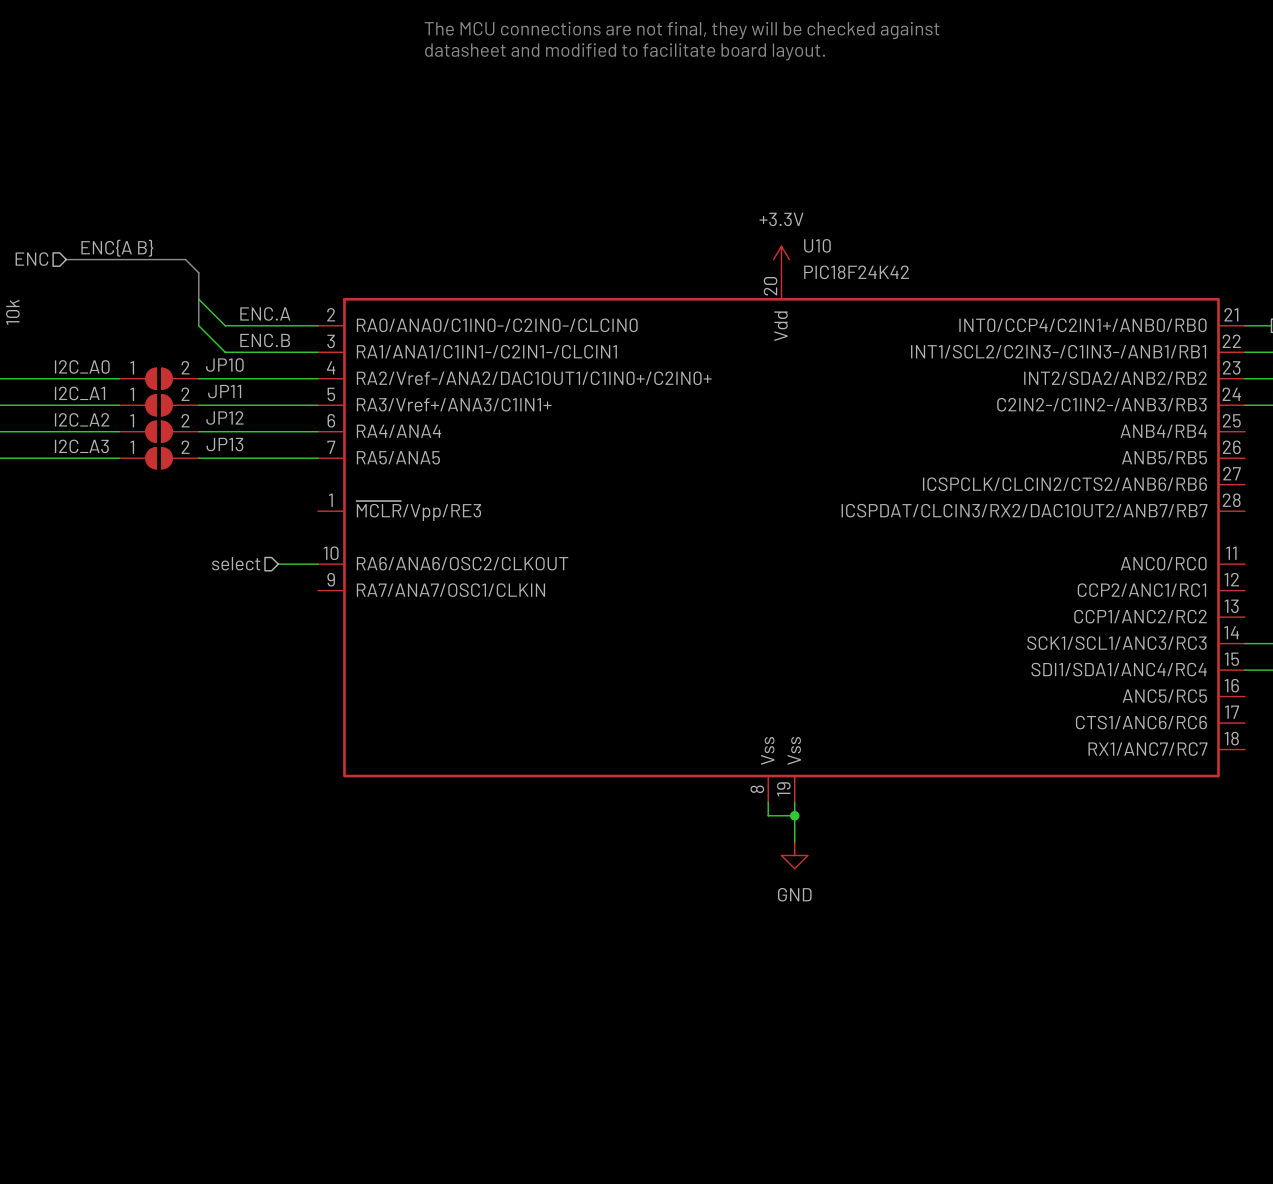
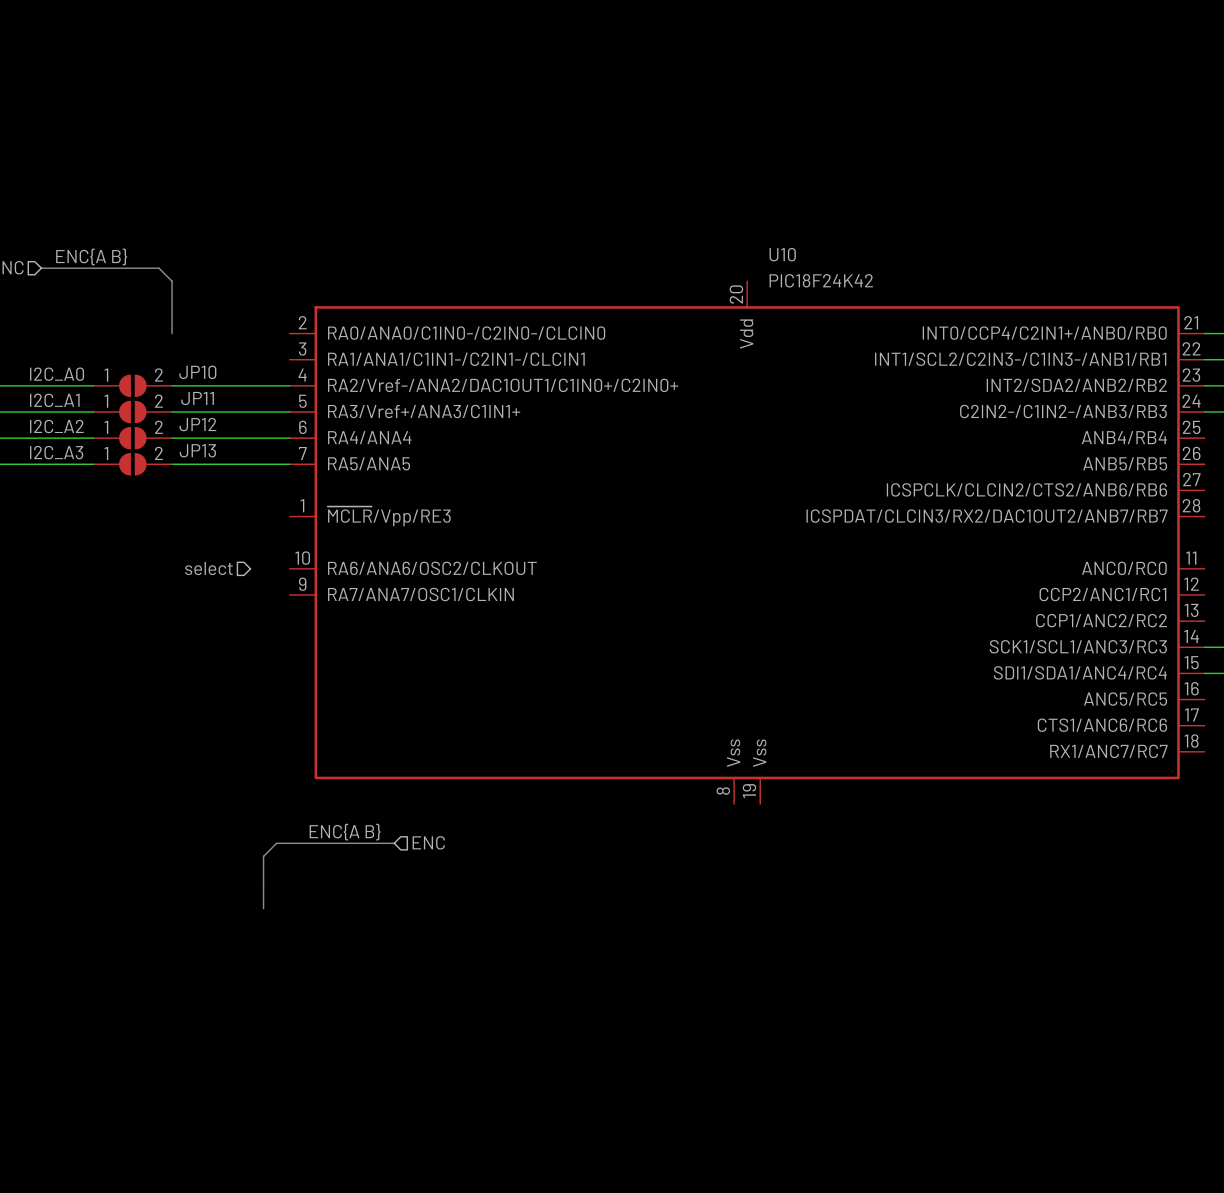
text: The MCU connections are not final, they will be checked against (682, 30) -> none
text: datasheet and modified to facilitate board layout. (625, 51) -> none
power symbol: +3.3V (781, 259) -> none
wire: (198, 299) (225, 325) (317, 325) -> none
label: ENC.A (265, 313) -> none
wire: (198, 325) (225, 352) (317, 352) -> none
label: ENC.B (265, 340) -> none
wire: (278, 564) (317, 564) -> none
wire: (768, 802) (768, 815) (794, 815) -> none
wire: (794, 802) (794, 842) -> none
junction: (794, 815) -> none
label: none -> ENC{A B} (345, 832)
hierarchical label: none -> ENC (428, 842)
bus: none -> (394, 843) (276, 843) (263, 856) (263, 908)
power symbol: GND (794, 855) -> none

